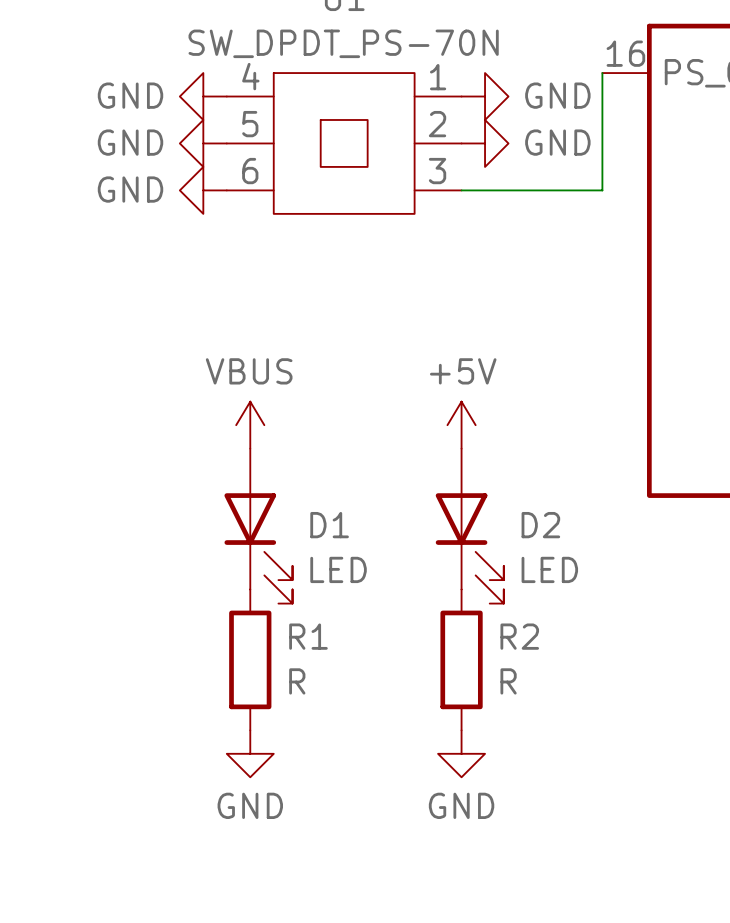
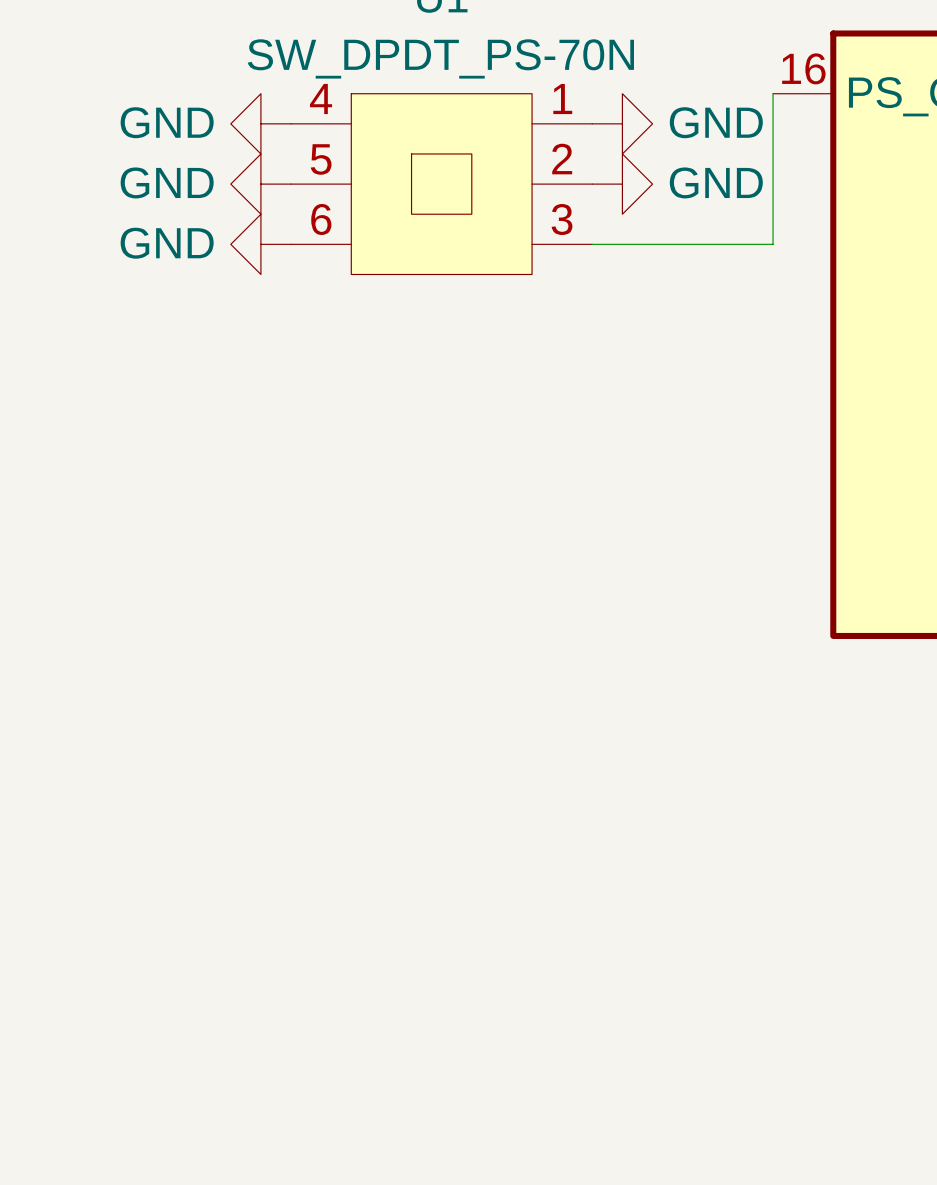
power symbol: VBUS (250, 425) -> none
power symbol: +5V (461, 425) -> none
D1: LED (258, 526) -> none
D2: LED (469, 526) -> none
R1: R (250, 659) -> none
R2: R (461, 659) -> none
power symbol: GND (250, 753) -> none
power symbol: GND (461, 753) -> none

